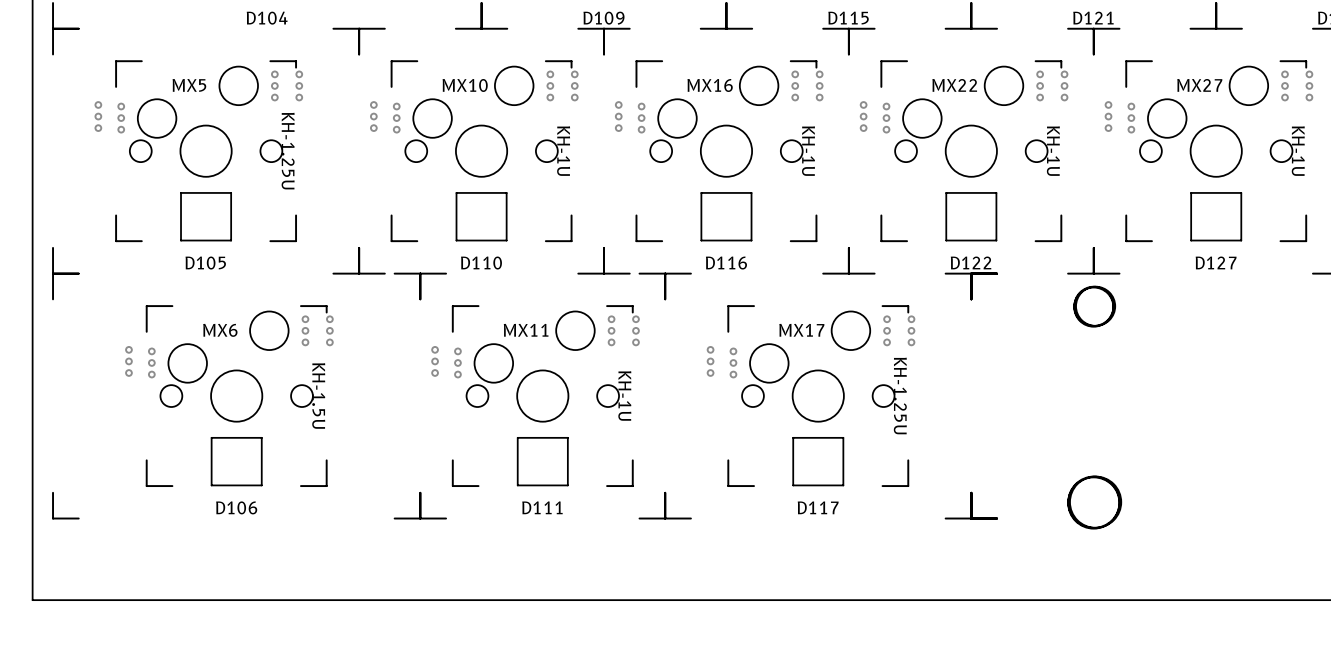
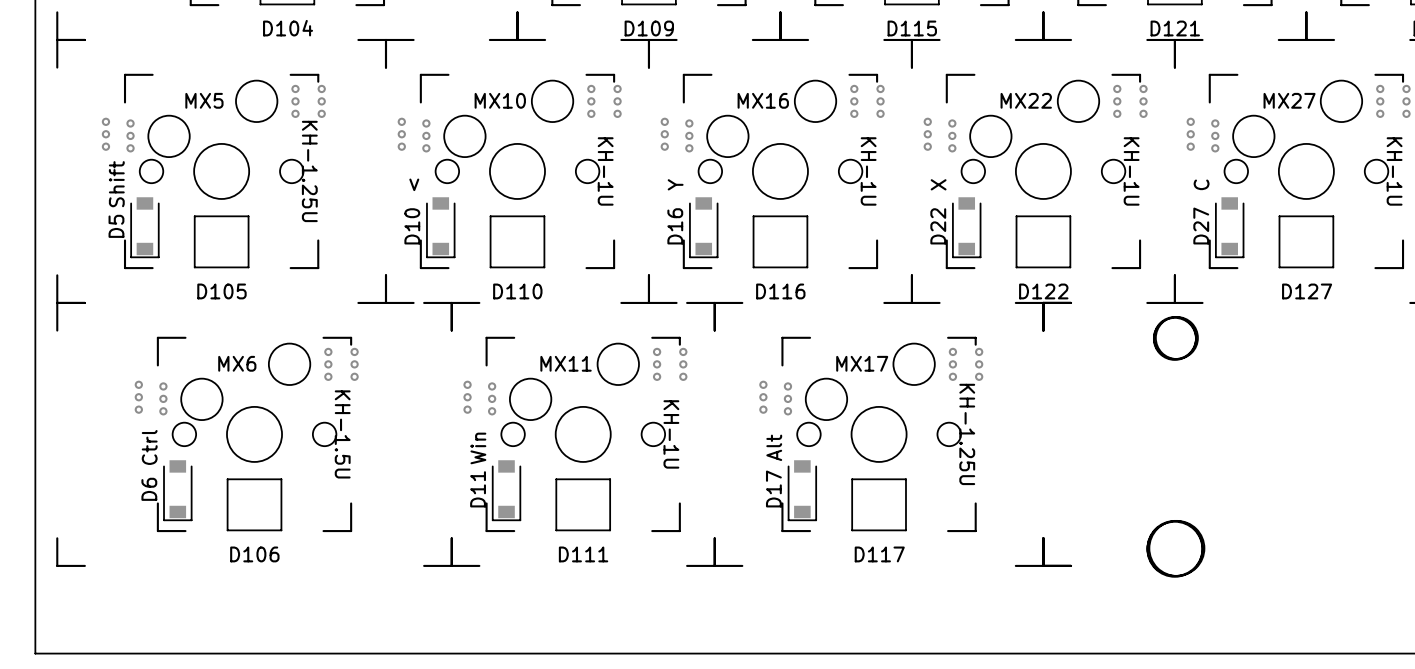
D5: none -> Shift (144, 227)
D10: none -> < (440, 227)
D16: none -> Y (703, 227)
D22: none -> X (966, 227)
D27: none -> C (1229, 227)
D6: none -> Ctrl (177, 490)
D11: none -> Win (506, 490)
D17: none -> Alt (802, 490)

